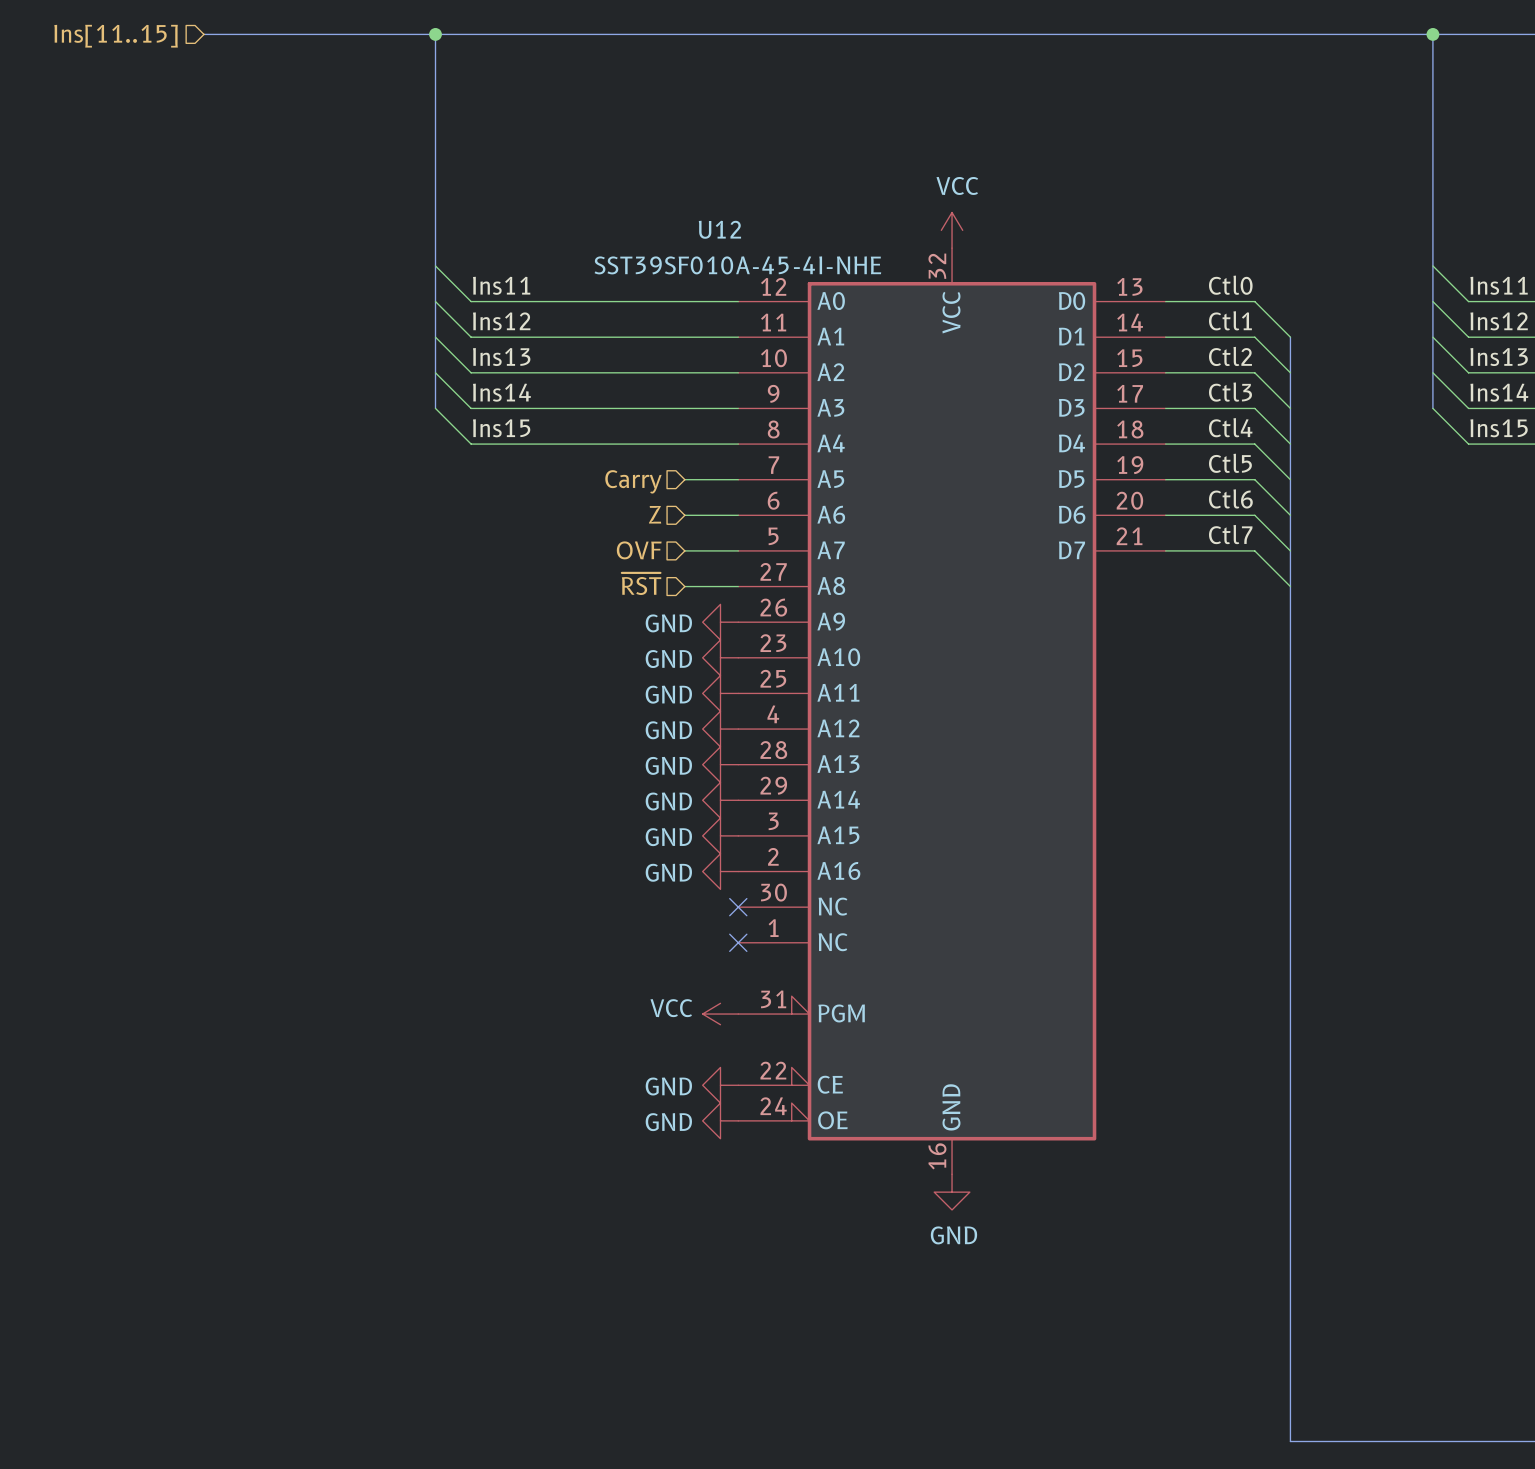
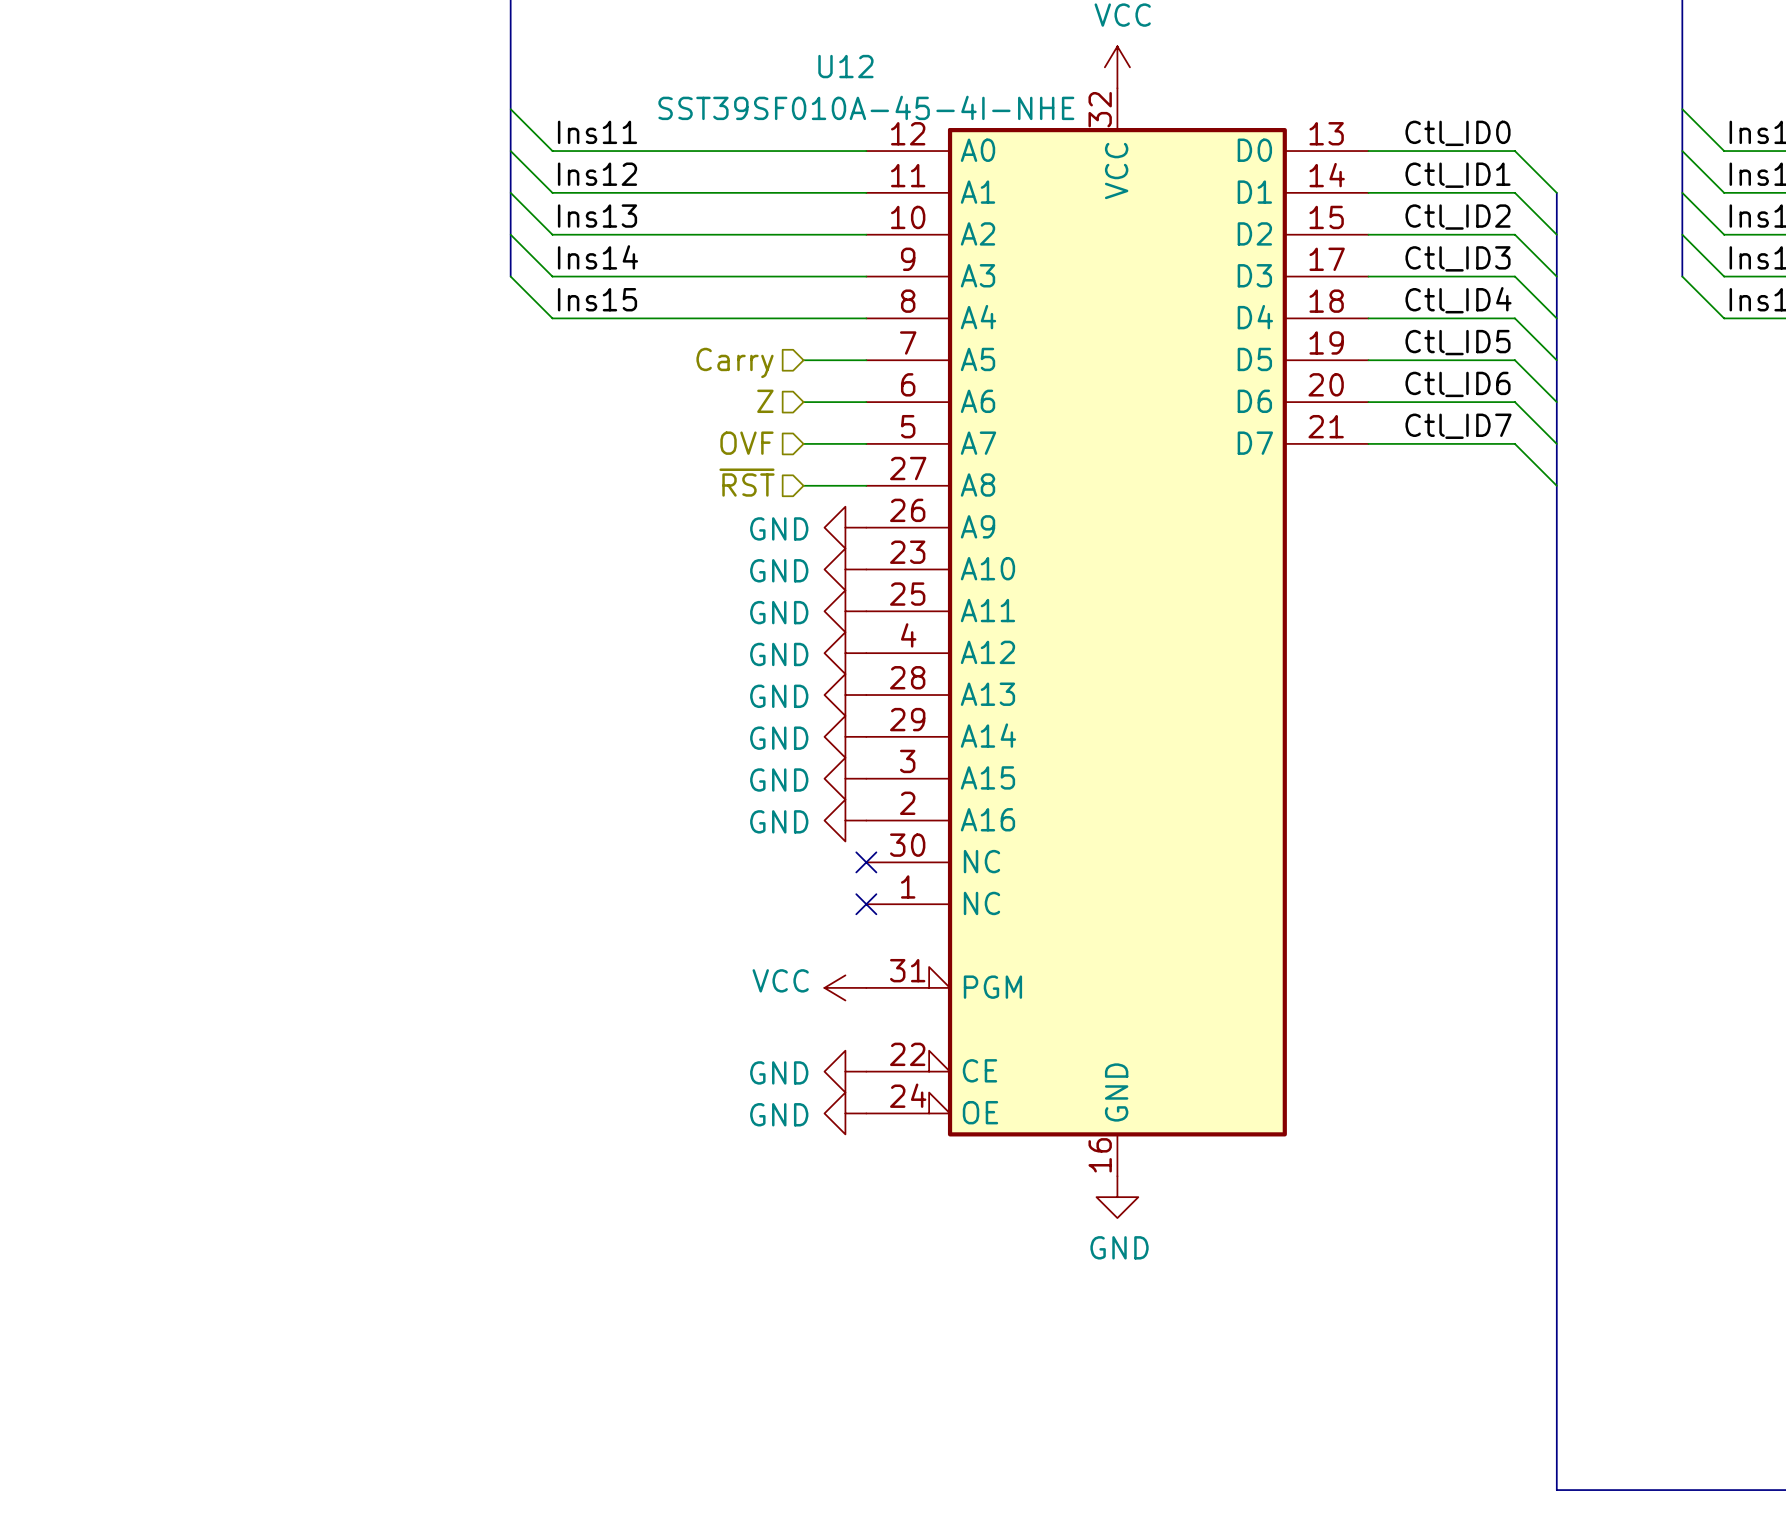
label: Ctl0 (1230, 285) -> Ctl_ID0 (1458, 133)
wire: (1254, 301) (1290, 337) -> (1473, 151) (1514, 151) (1556, 192)
label: Ctl1 (1230, 320) -> Ctl_ID1 (1458, 175)
wire: (1254, 337) (1290, 372) -> (1473, 192) (1514, 192) (1556, 234)
bus: (1290, 337) (1290, 1441) (1326, 1441) -> (1556, 192) (1556, 1490)
label: Ctl2 (1230, 356) -> Ctl_ID2 (1458, 217)
wire: (1254, 372) (1290, 408) -> (1473, 234) (1514, 234) (1556, 276)
label: Ctl3 (1230, 392) -> Ctl_ID3 (1458, 258)
wire: (1254, 408) (1290, 444) -> (1473, 276) (1514, 276) (1556, 318)
label: Ctl4 (1230, 427) -> Ctl_ID4 (1458, 300)
wire: (1254, 444) (1290, 479) -> (1473, 318) (1514, 318) (1556, 360)
label: Ctl5 (1230, 463) -> Ctl_ID5 (1458, 342)
wire: (1254, 479) (1290, 515) -> (1473, 360) (1514, 360) (1556, 402)
label: Ctl6 (1230, 498) -> Ctl_ID6 (1458, 384)
wire: (1254, 515) (1290, 550) -> (1473, 402) (1514, 402) (1556, 443)
label: Ctl7 (1230, 534) -> Ctl_ID7 (1458, 426)
wire: (1254, 550) (1290, 586) -> (1473, 443) (1514, 443) (1556, 485)

